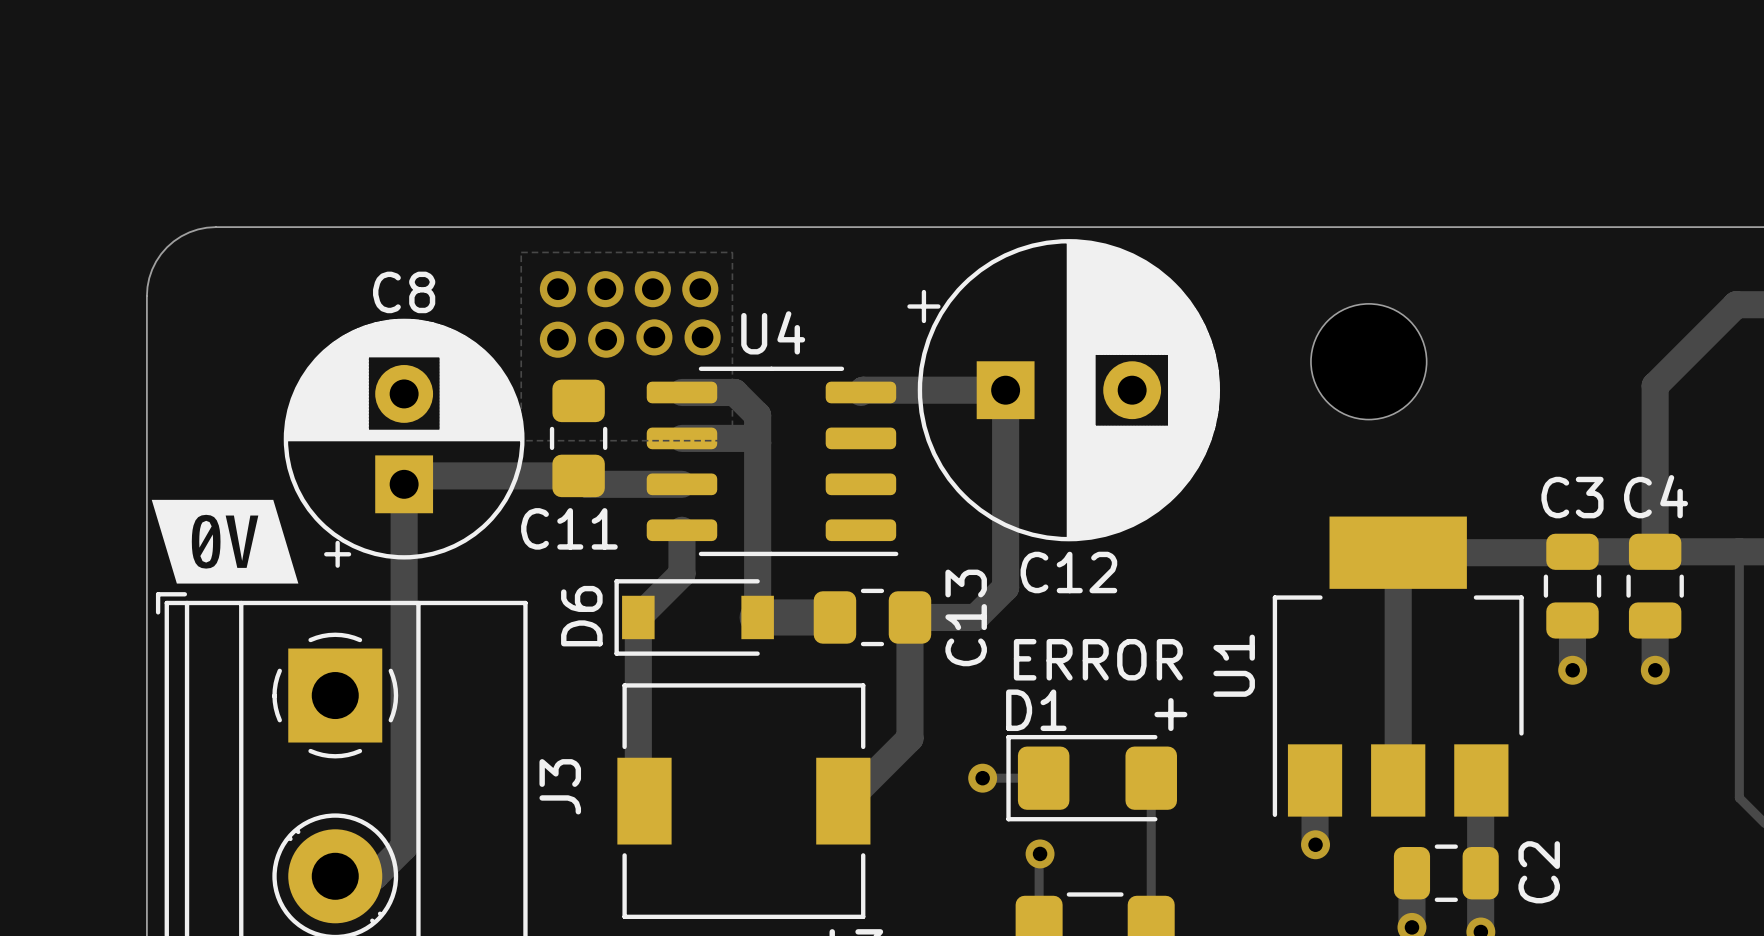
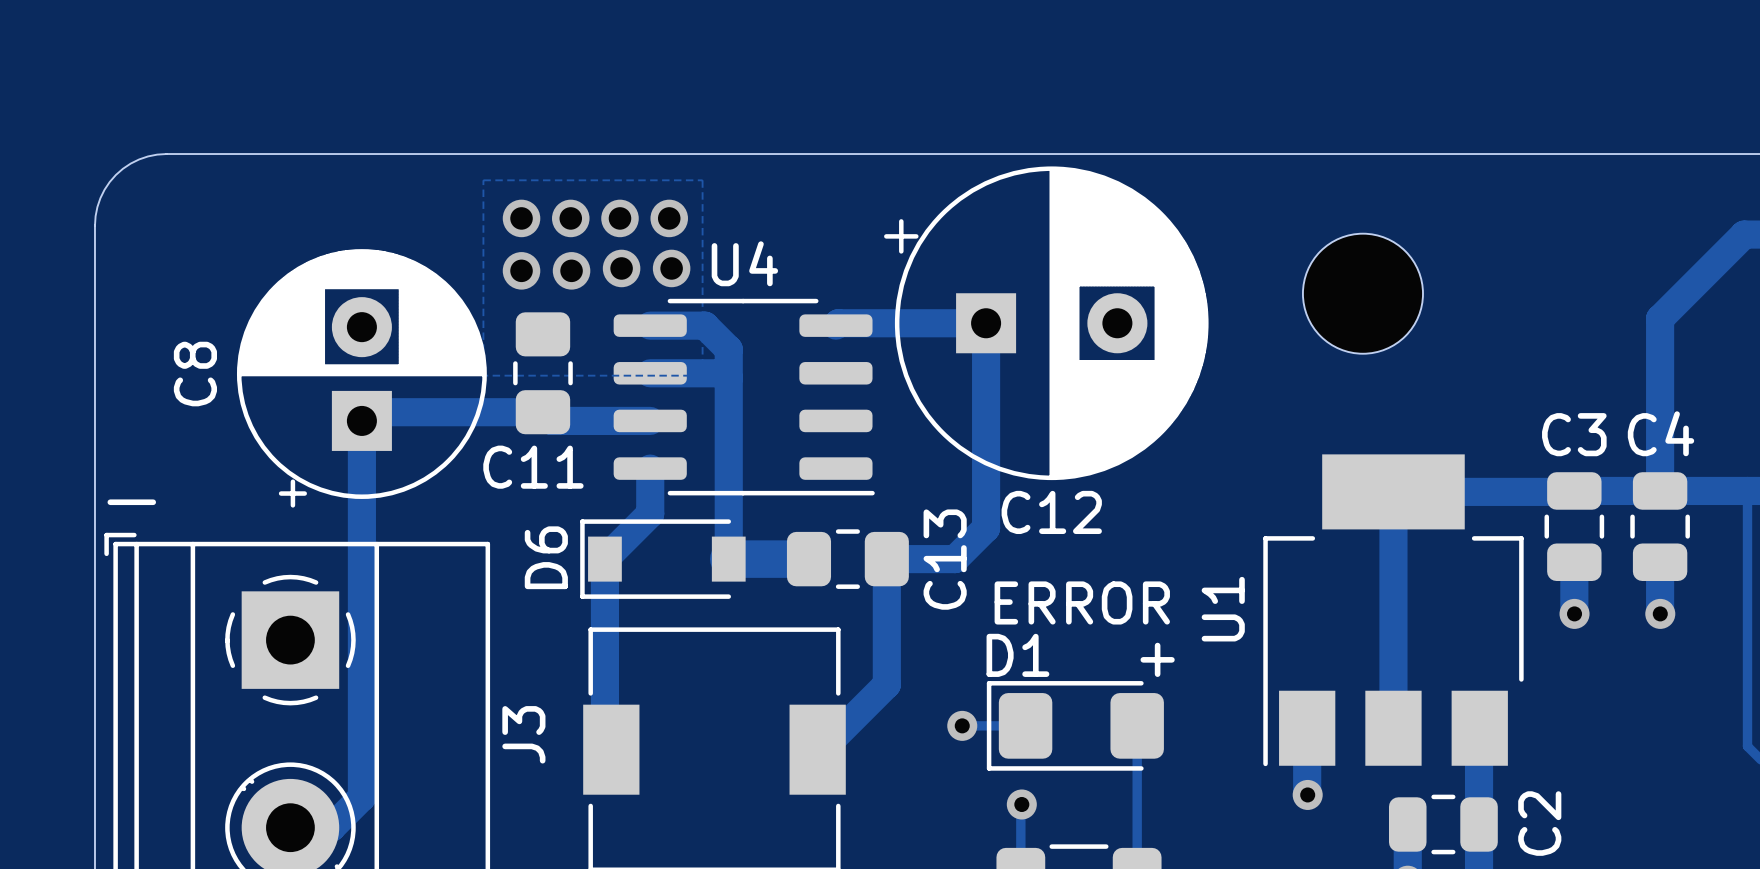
C8 name rotation: 0° (404, 292) -> 90° counterclockwise (195, 374)
C8 name position: C8 (404, 292) -> C8 (195, 374)
drawing: [151, 499, 299, 584] -> none
text: none -> - (131, 502)

